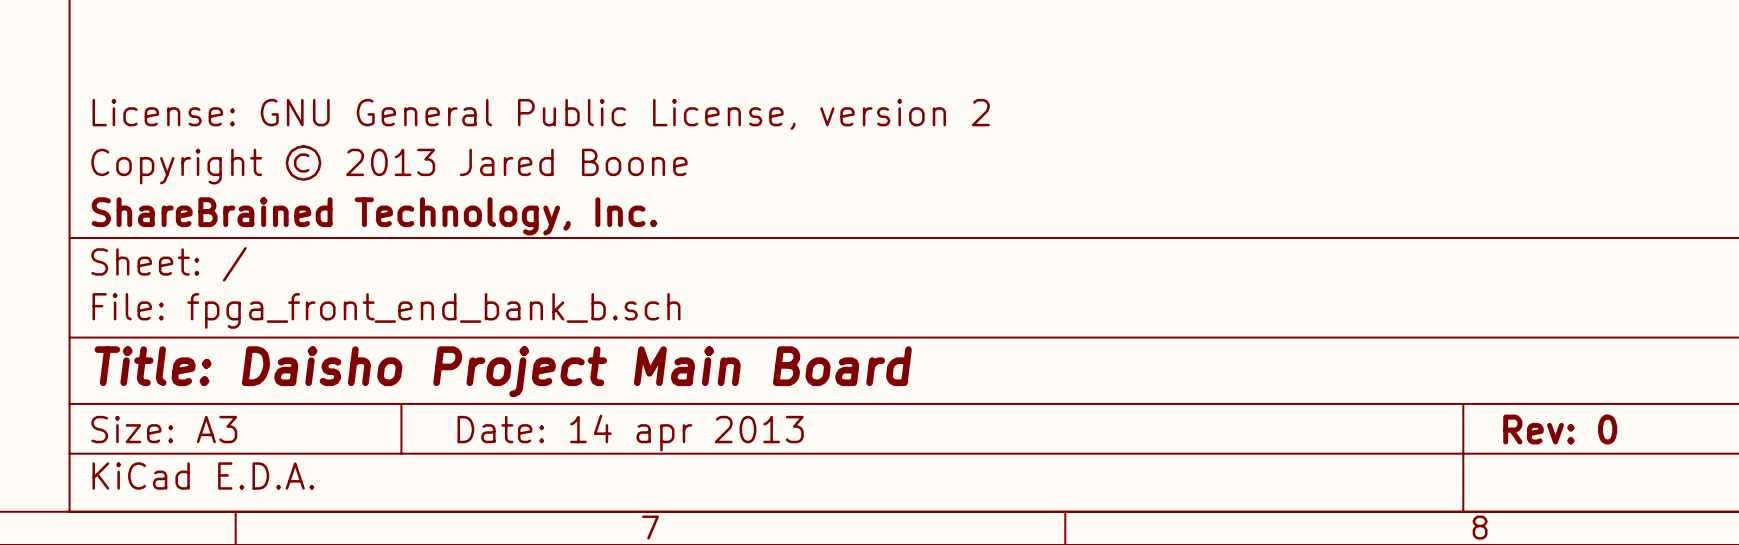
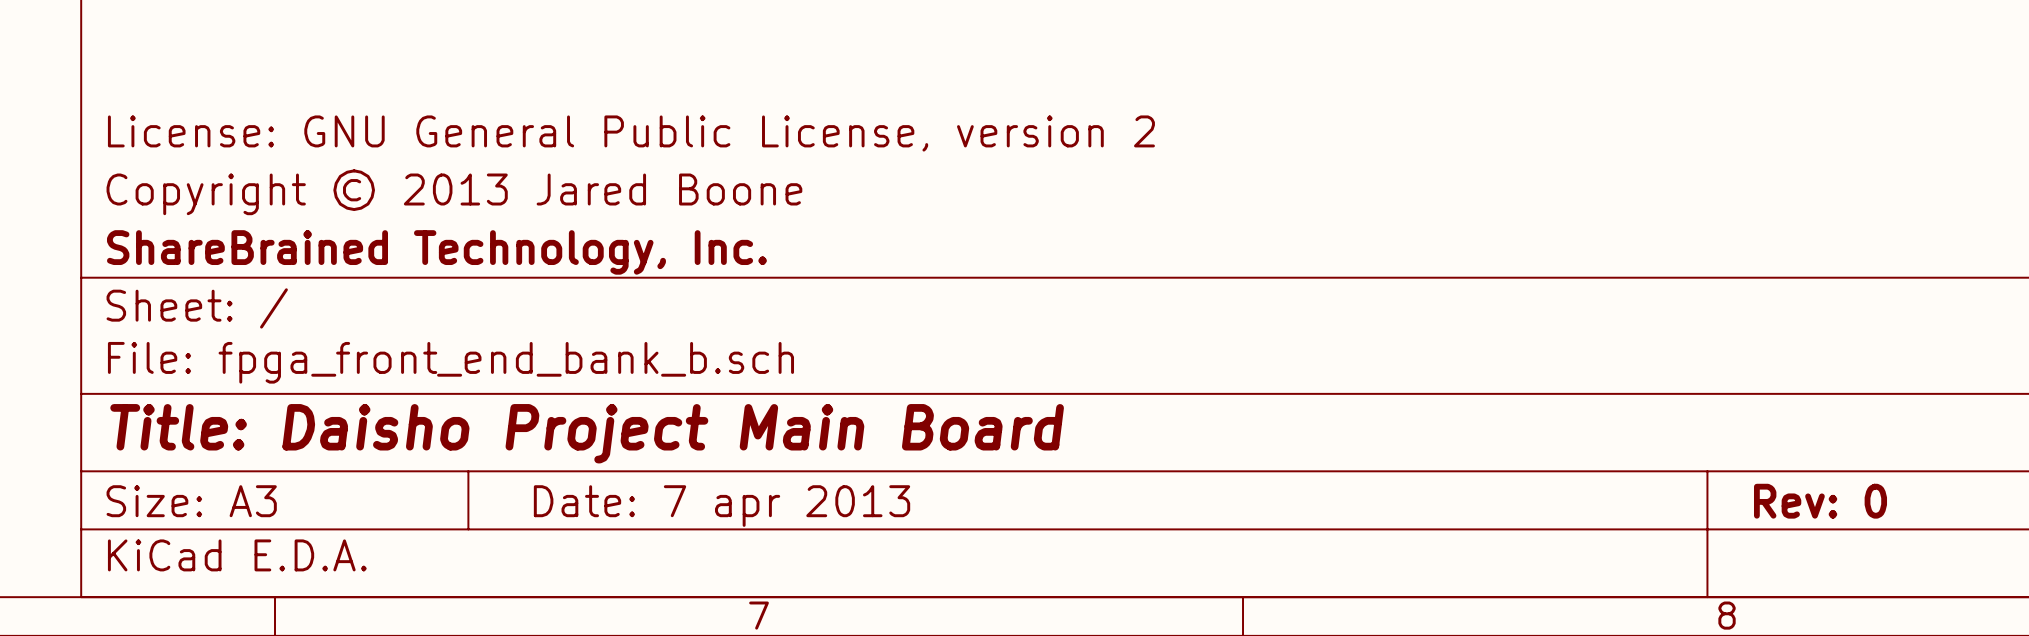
title block: Date: 14 apr 2013 (630, 433) -> Date: 7 apr 2013 (722, 506)

